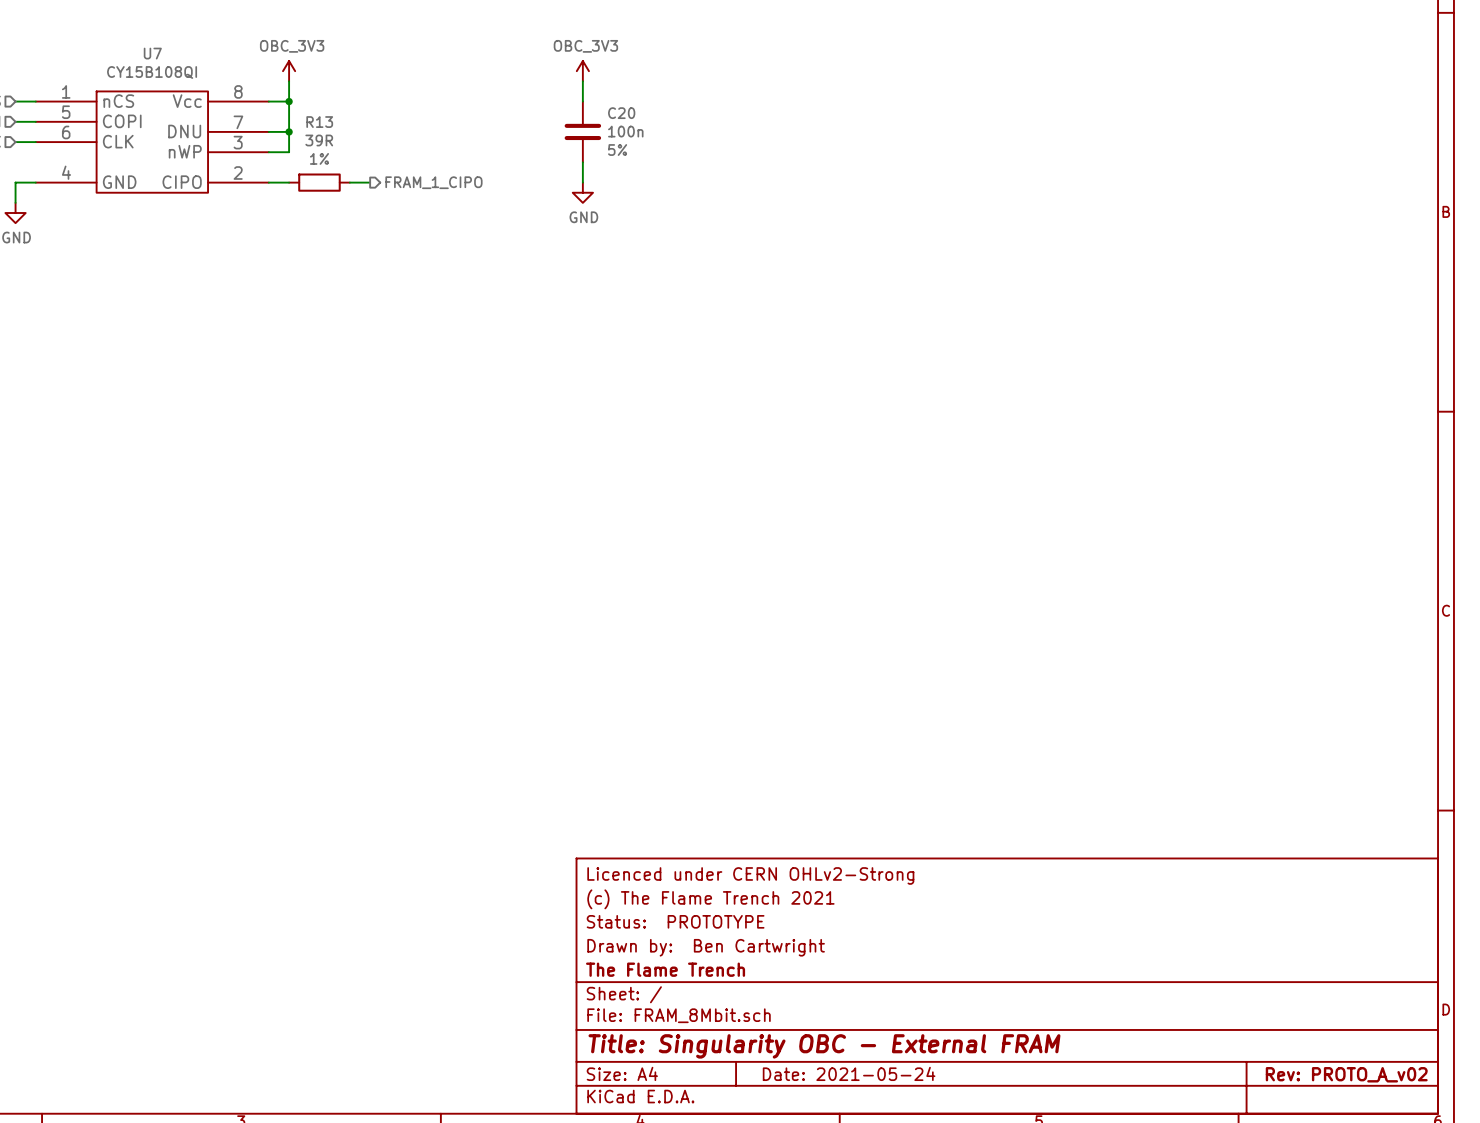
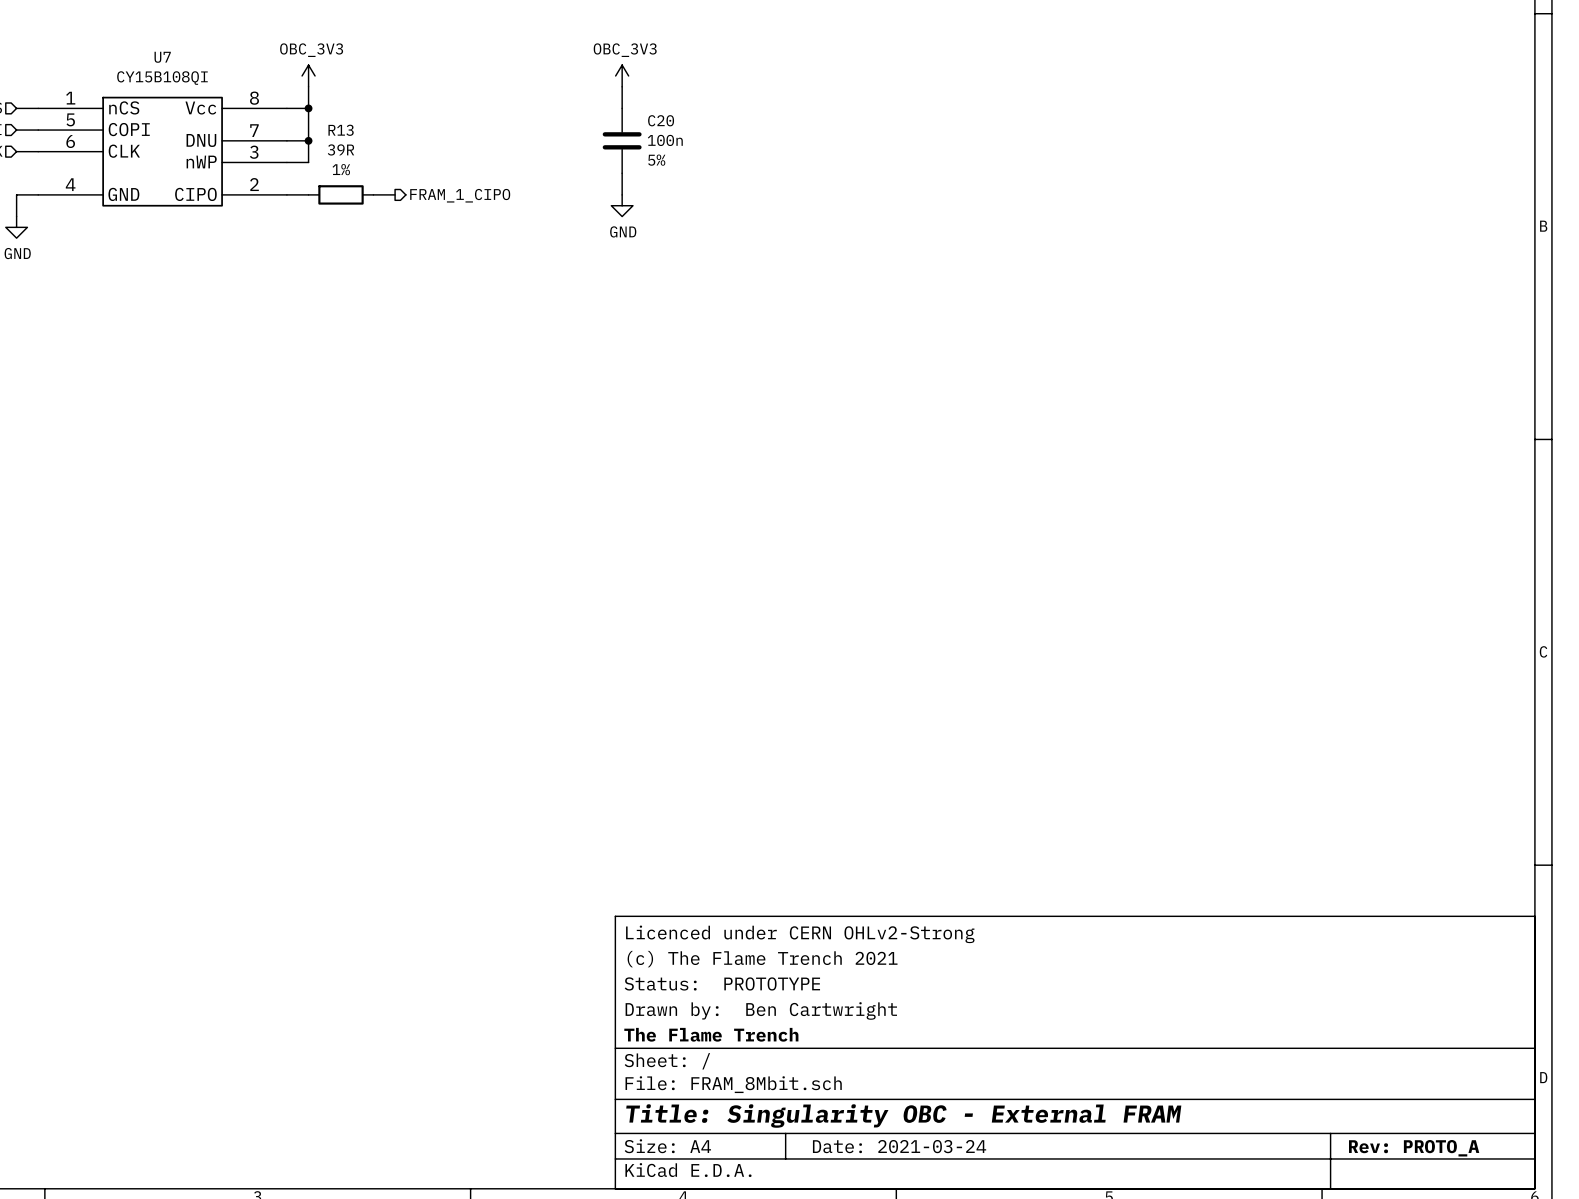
title block: Date: 2021-05-24 (849, 1073) -> Date: 2021-03-24 (899, 1146)
title block: Rev: PROTO_A_v02 (1346, 1074) -> Rev: PROTO_A (1414, 1148)

